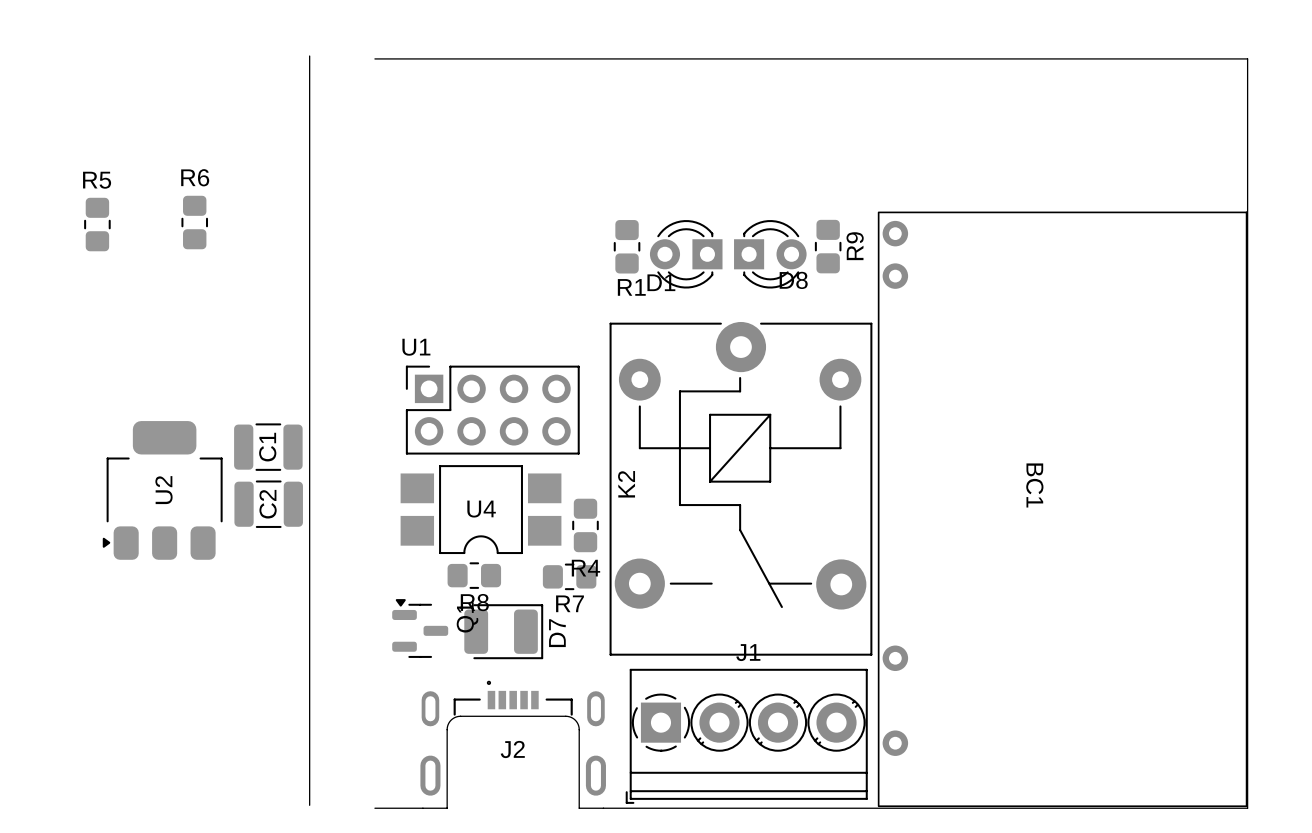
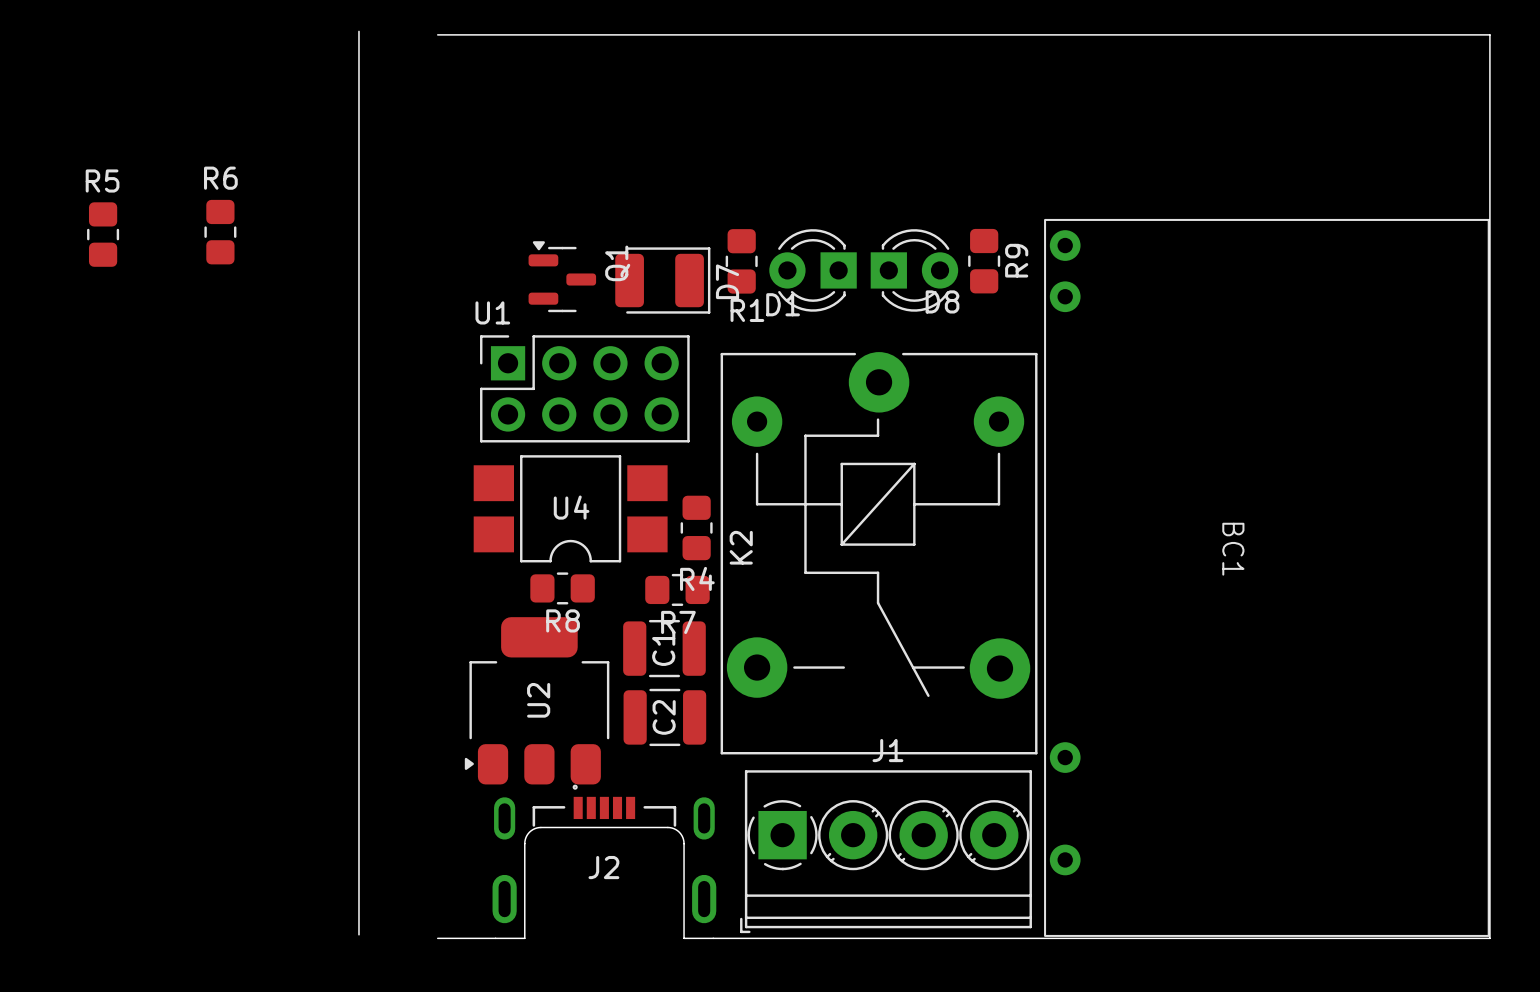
U1 position: (492, 410) -> (584, 388)
C1 position: (268, 447) -> (664, 648)
U2 position: (162, 490) -> (537, 700)
C2 position: (268, 504) -> (664, 717)
U4 position: (481, 509) -> (570, 508)
R4 position: (585, 525) -> (696, 527)
R8 position: (474, 575) -> (562, 588)
R7 position: (569, 576) -> (677, 589)
Q1 position: (420, 628) -> (562, 276)
D7 position: (503, 631) -> (662, 280)

